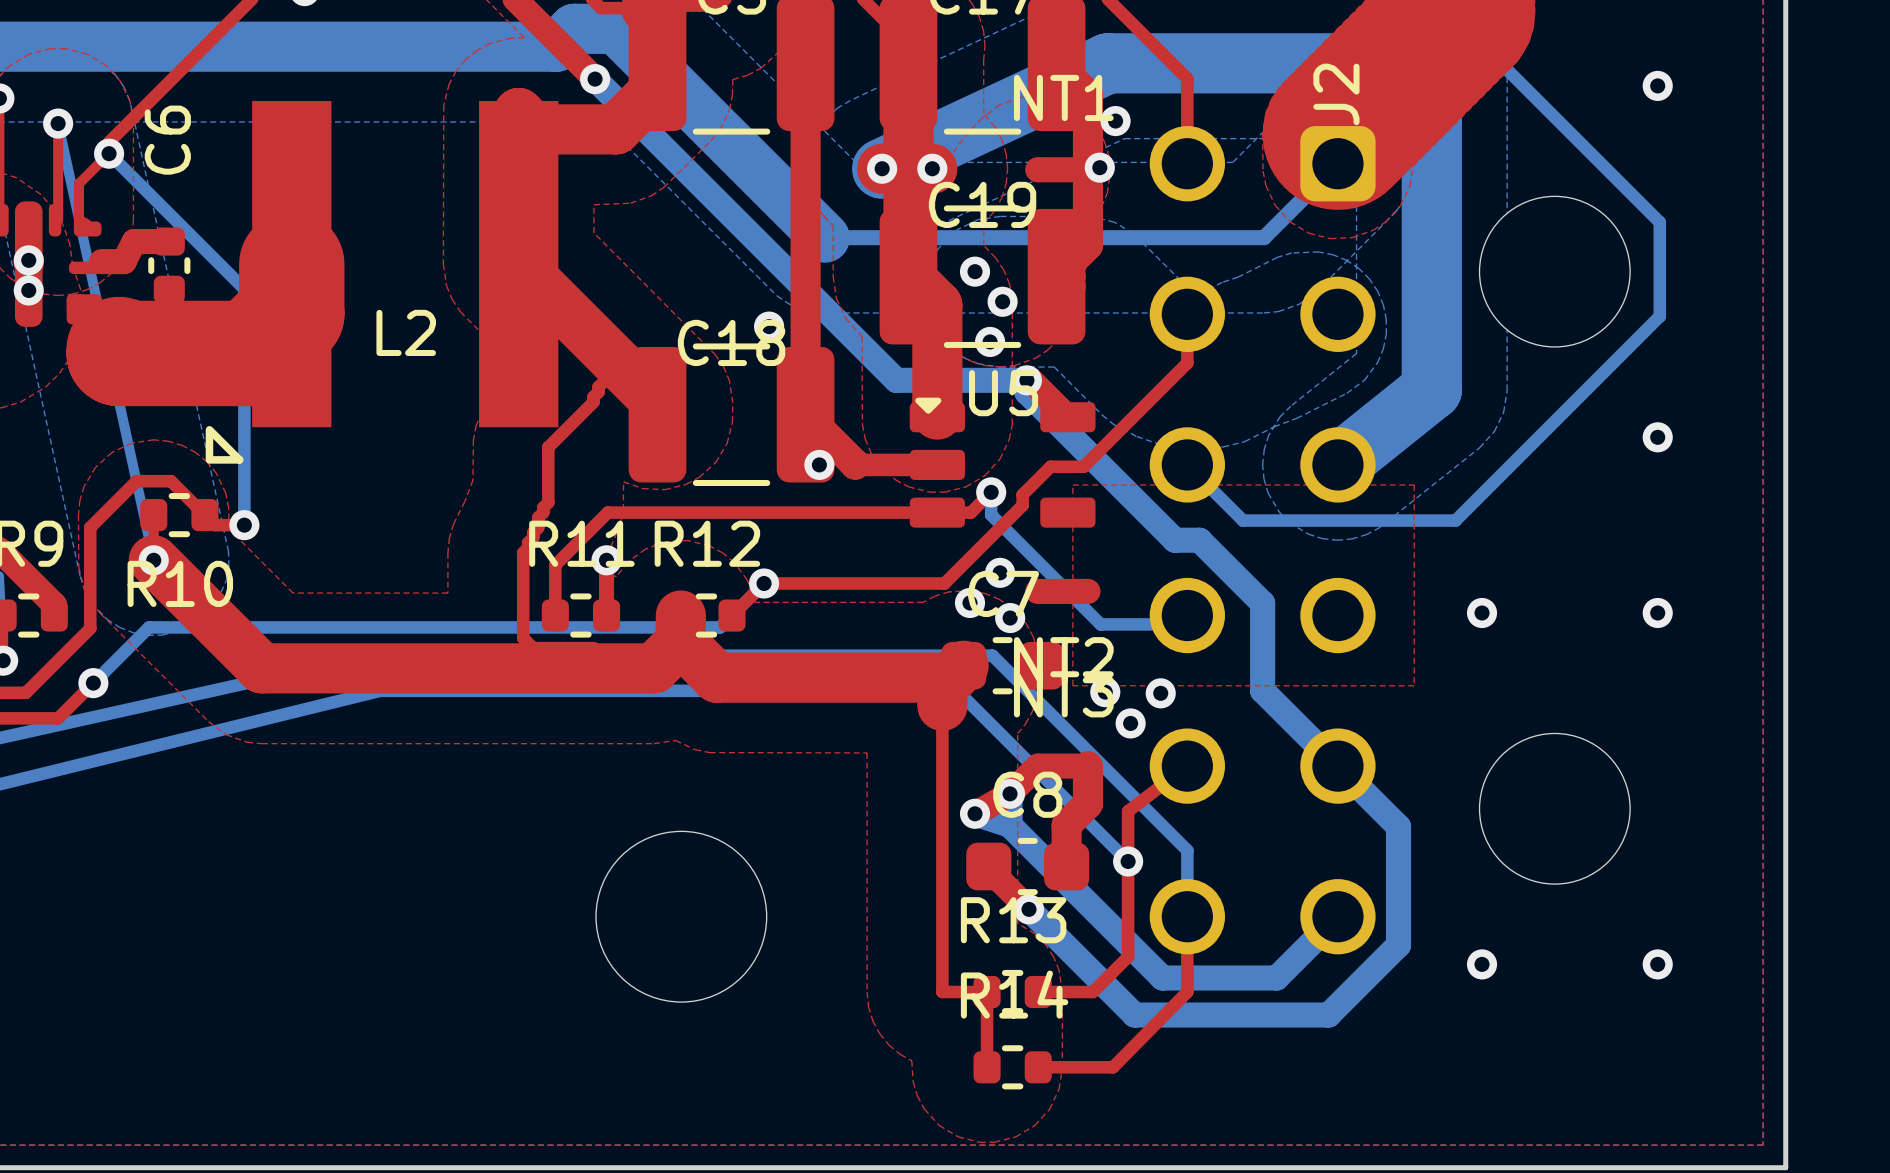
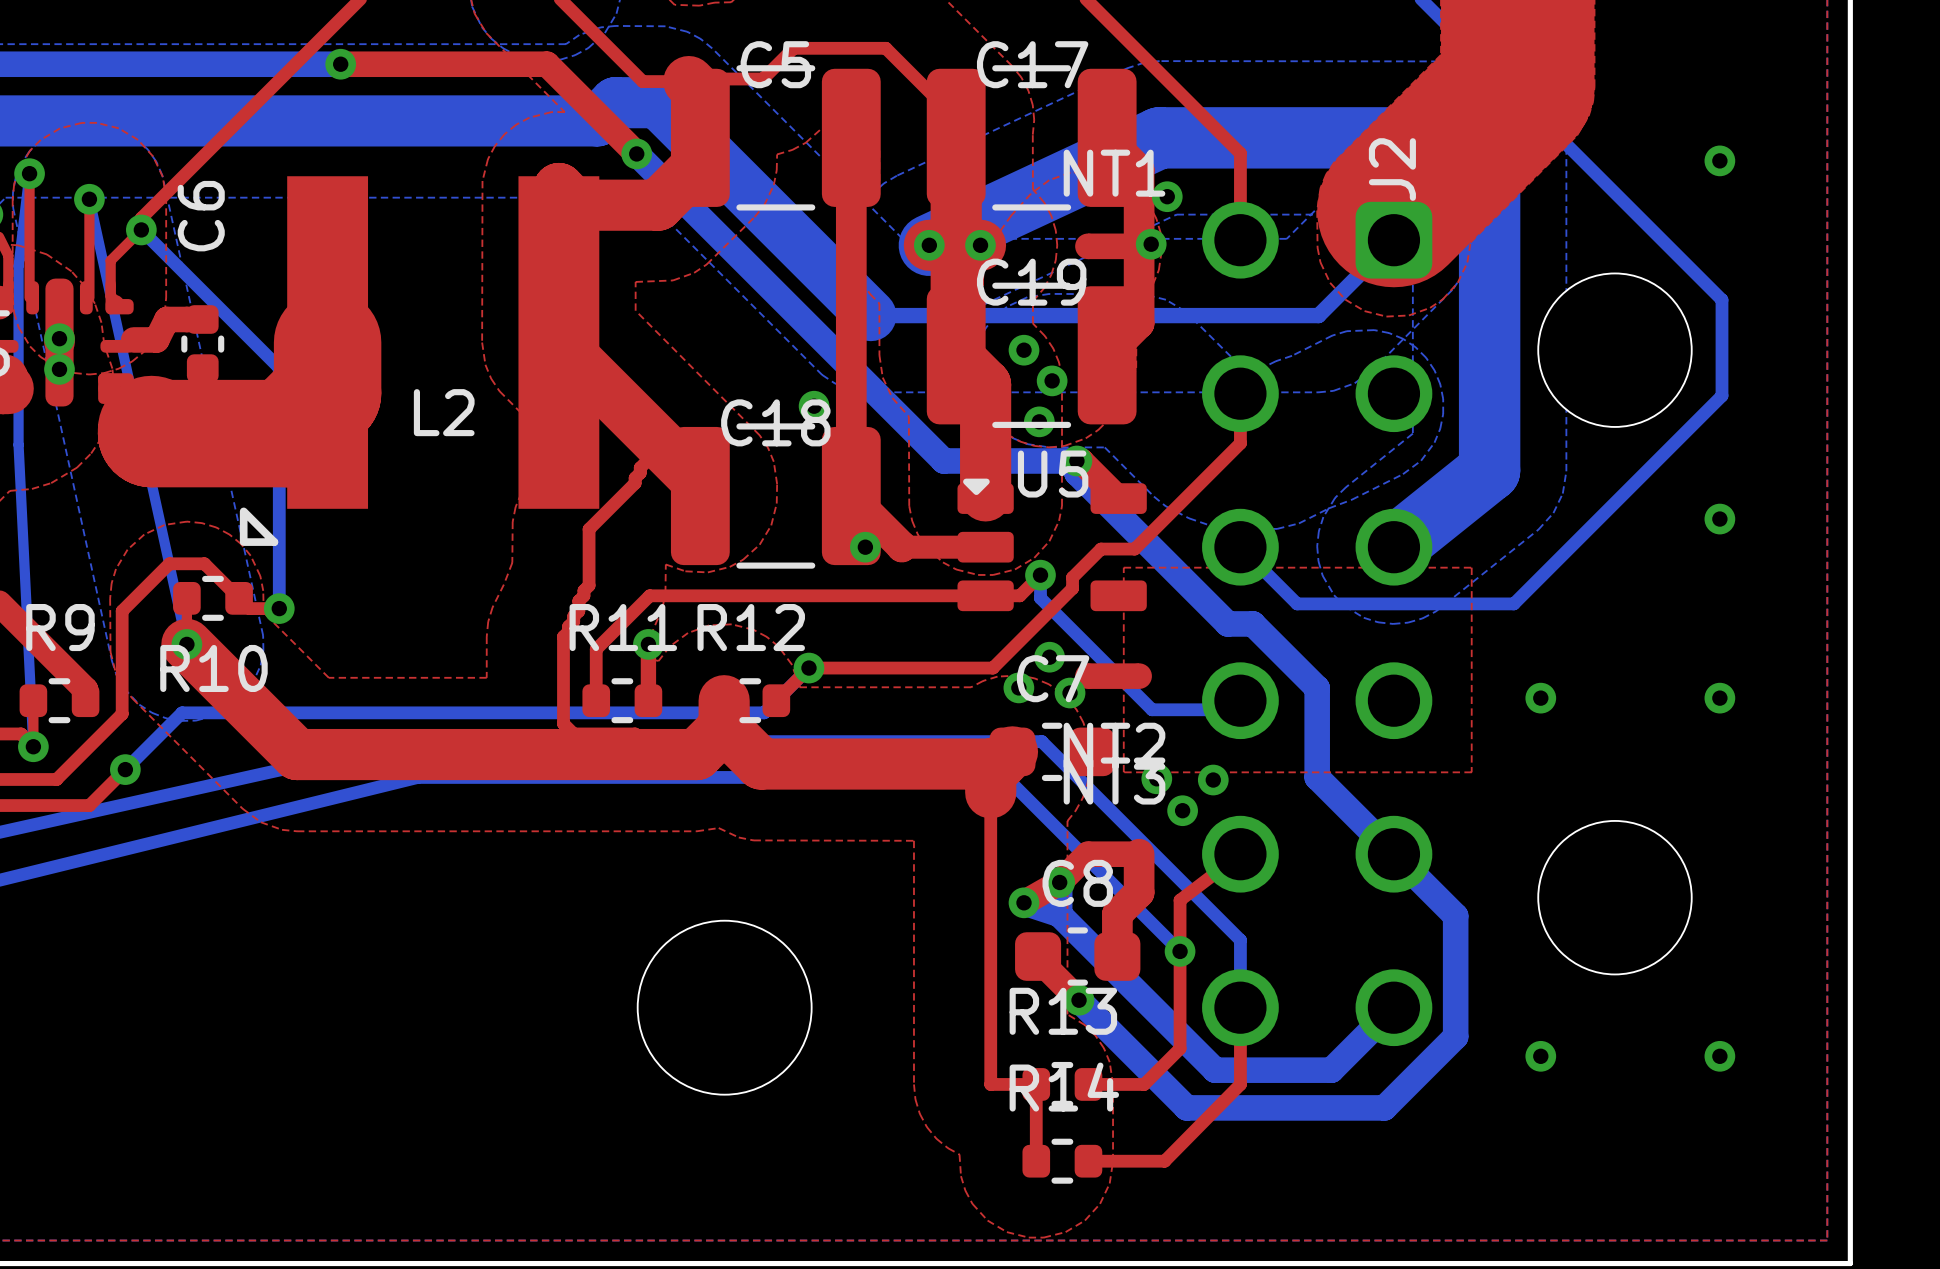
via position: (1010, 618) -> (1070, 693)

